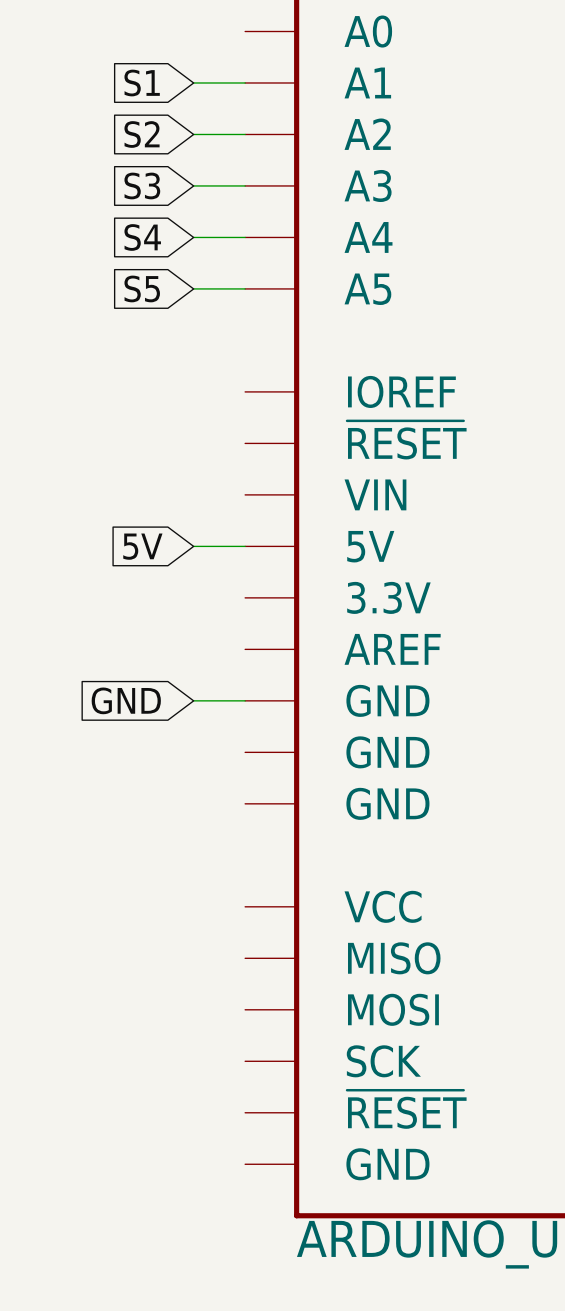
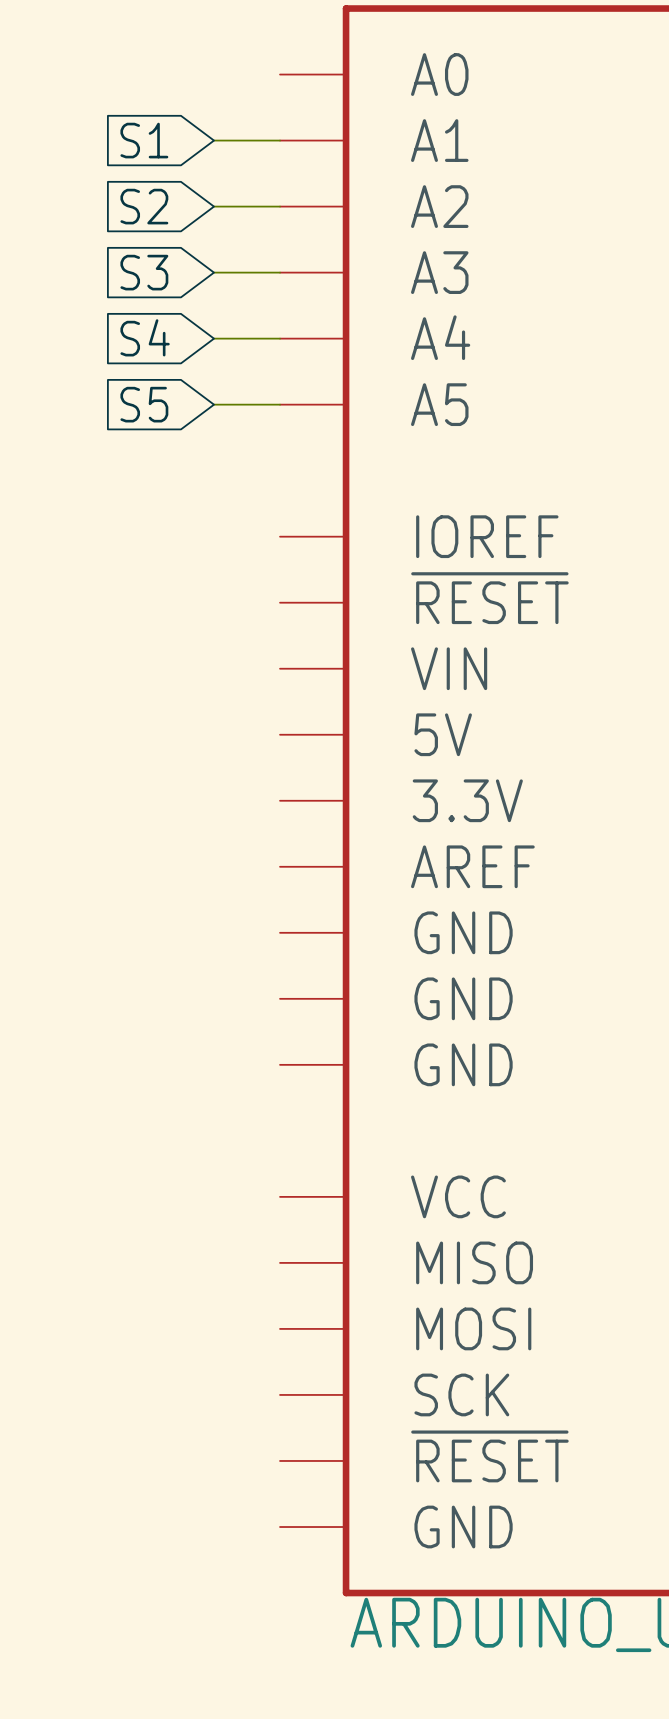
global label: 5V (142, 546) -> none
wire: (193, 546) (245, 546) -> none
global label: GND (126, 700) -> none
wire: (193, 700) (245, 700) -> none

